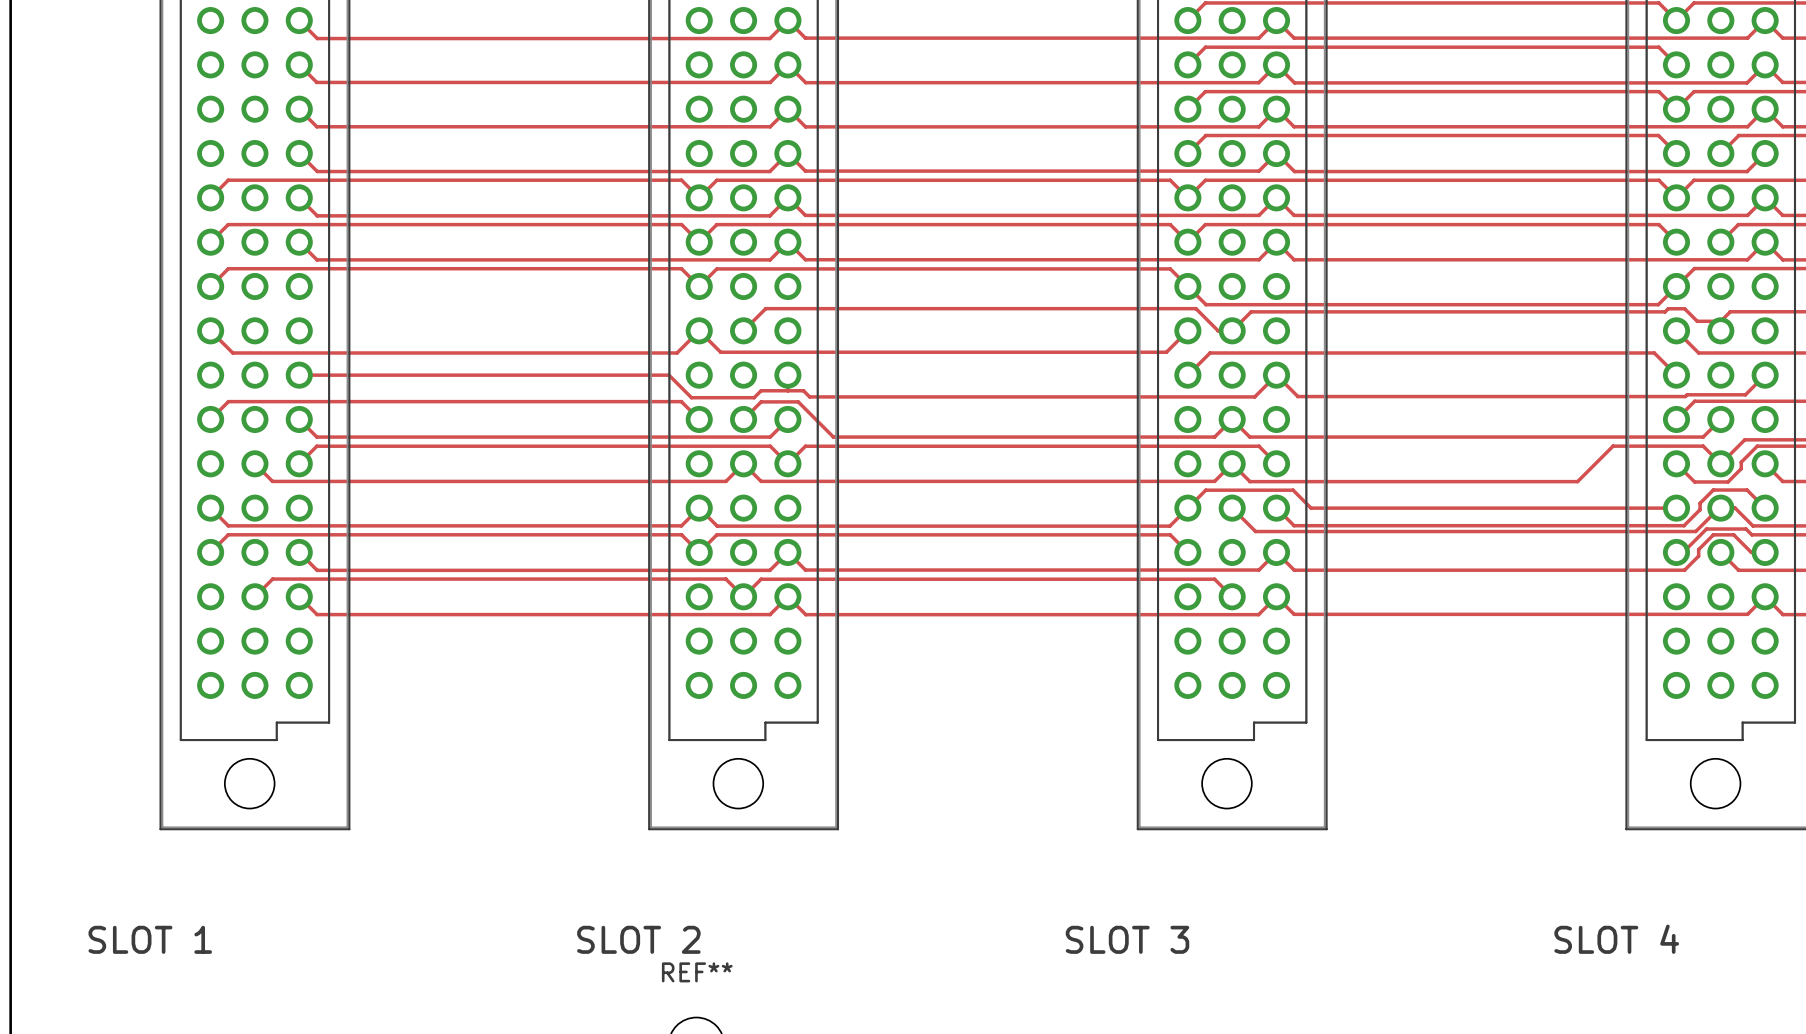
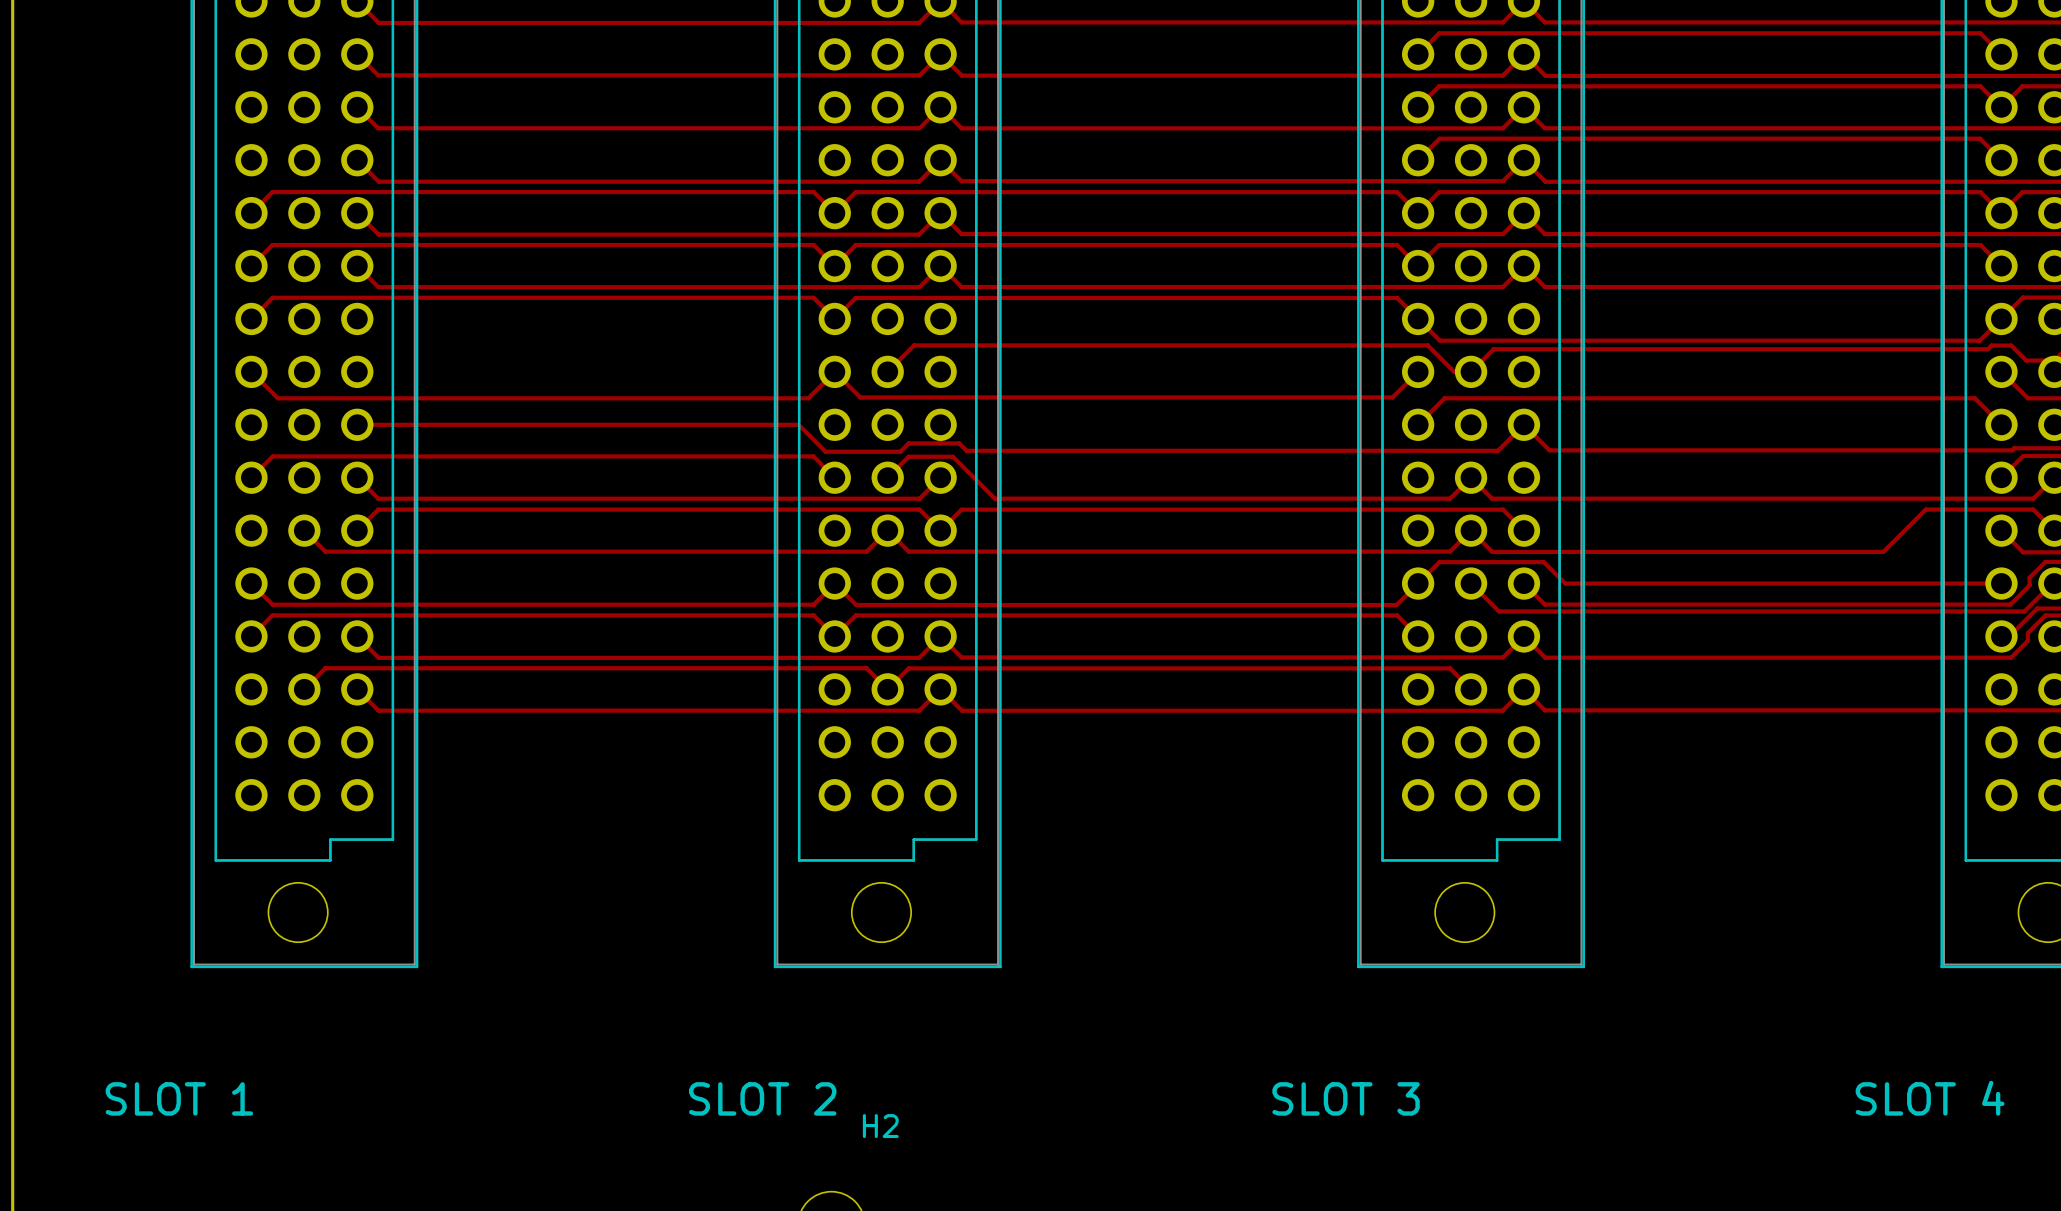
REF** name: REF** (697, 972) -> H2 (880, 1126)

